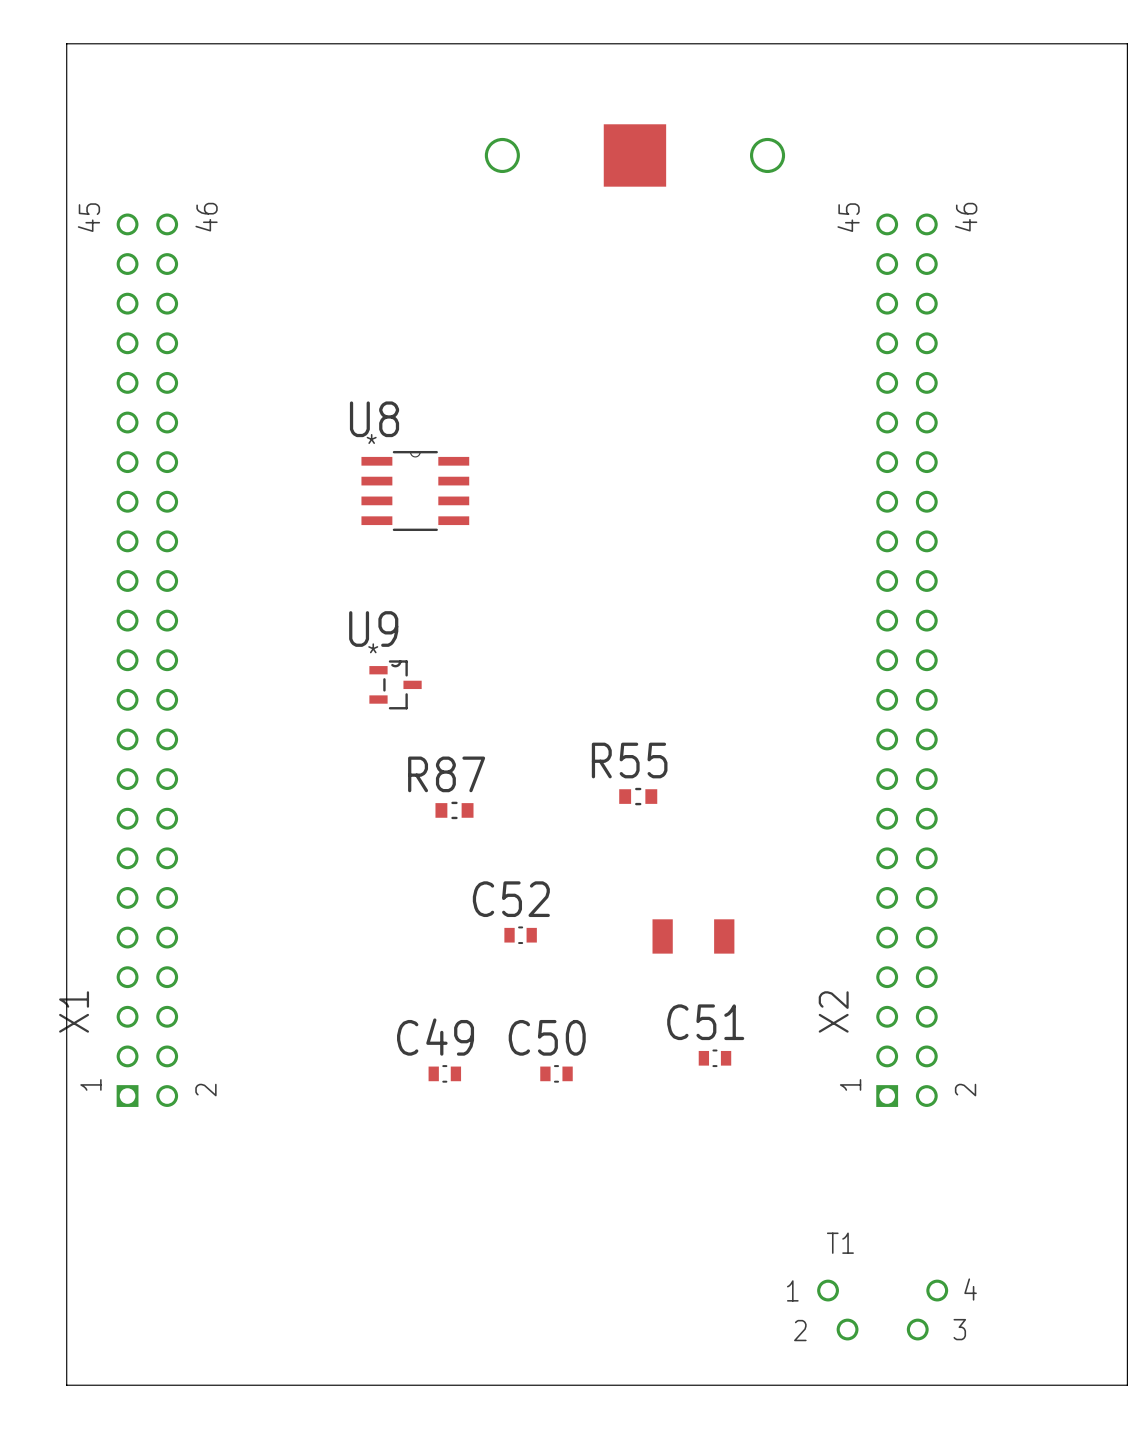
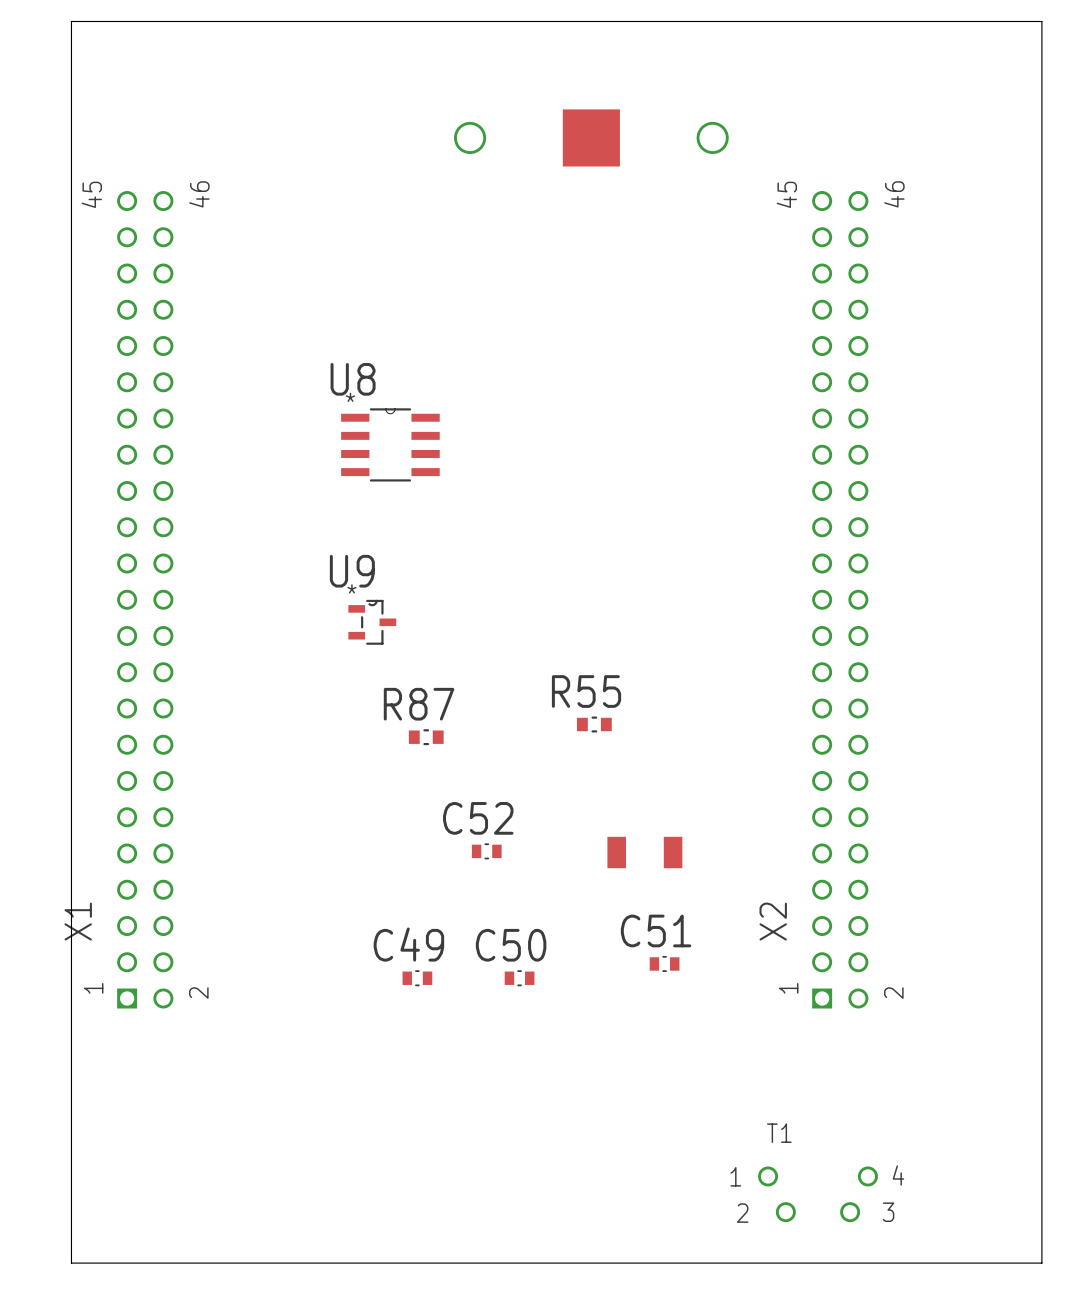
board edge: (66, 43) (1127, 43) -> (71, 35) (71, 21) (1041, 21) (1041, 35)

